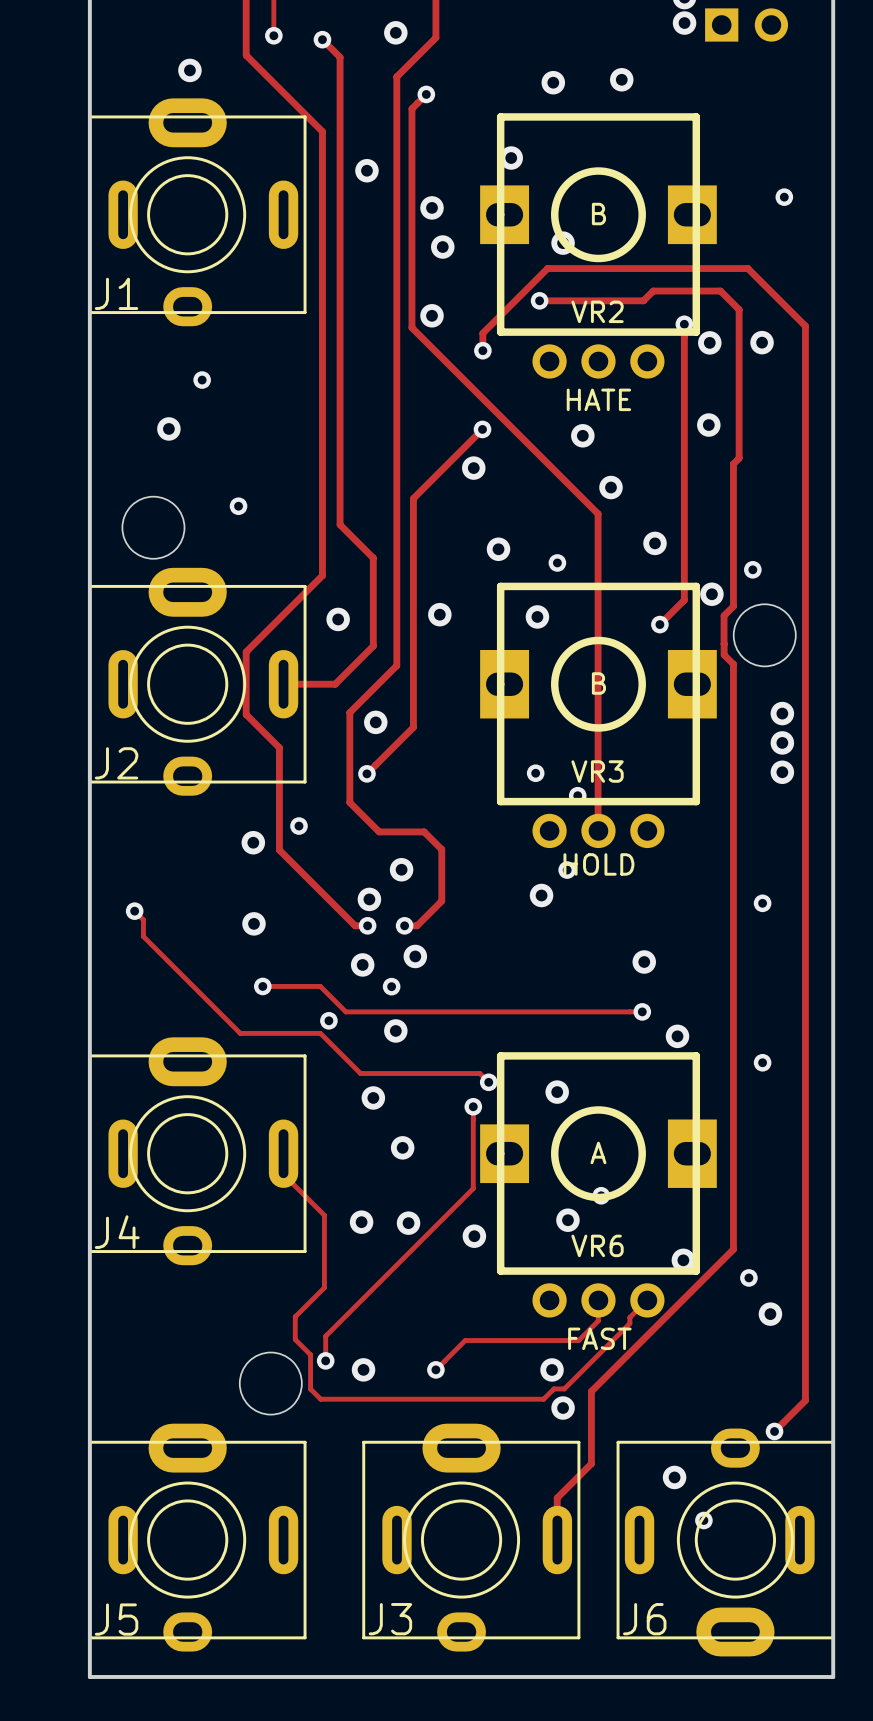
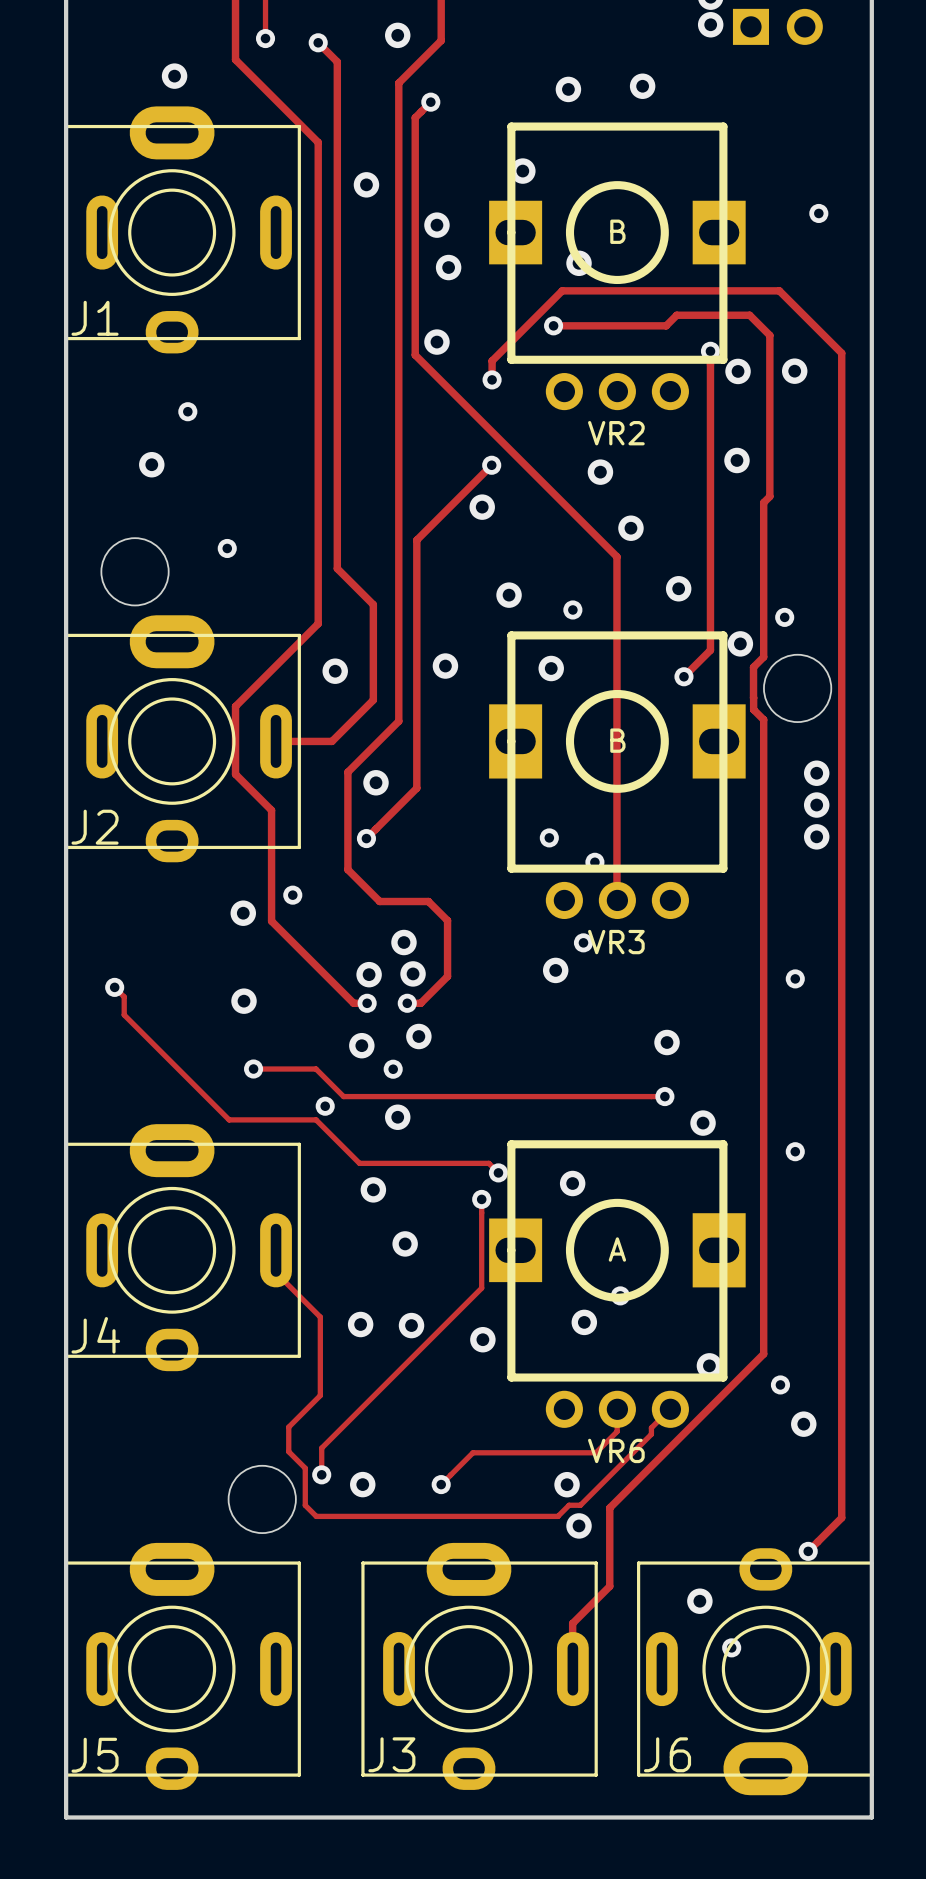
VR2 name position: VR2 (597, 311) -> VR2 (616, 433)
text: HATE (598, 399) -> none
VR3 name position: VR3 (597, 771) -> VR3 (616, 942)
text: HOLD (598, 864) -> none
via: none -> (413, 973)
VR6 name position: VR6 (597, 1245) -> VR6 (616, 1450)
text: FAST (599, 1338) -> none

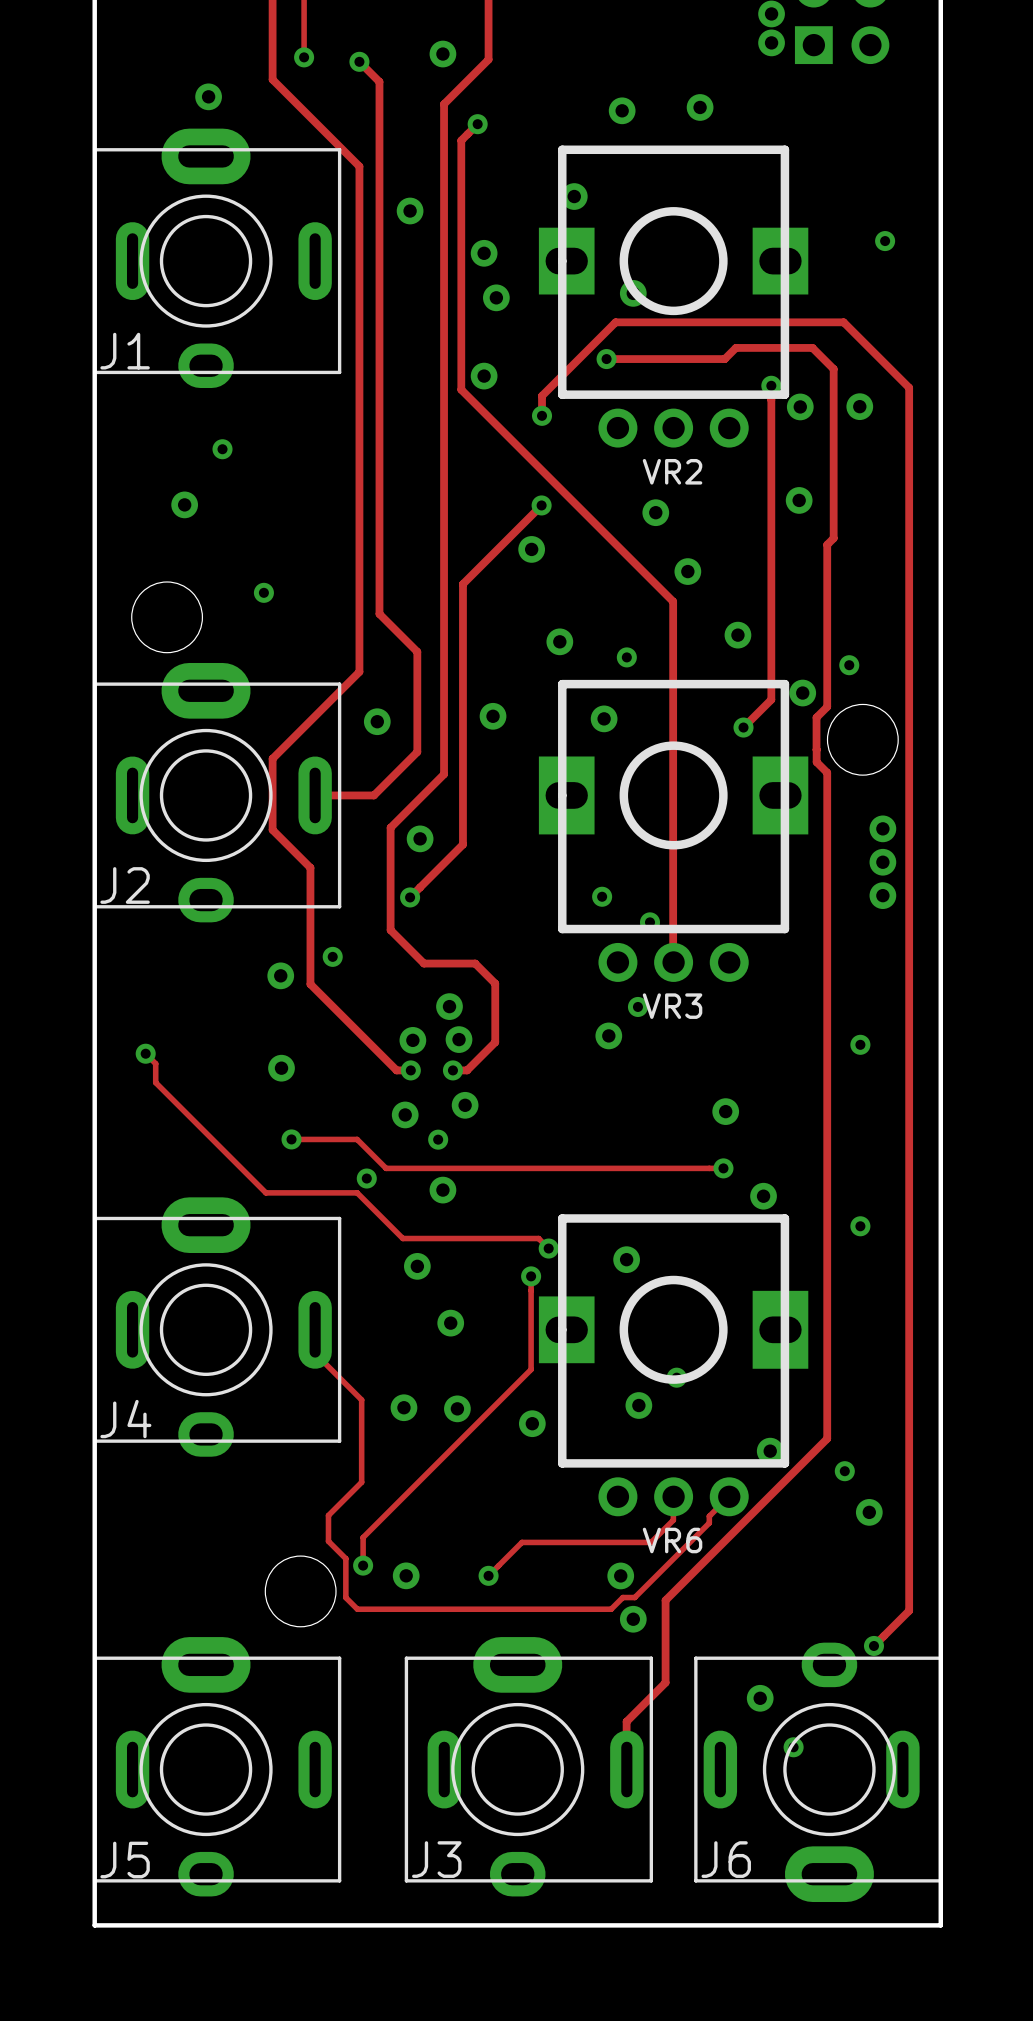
text: B (617, 231) -> none
text: B (617, 740) -> none
text: A (617, 1249) -> none

